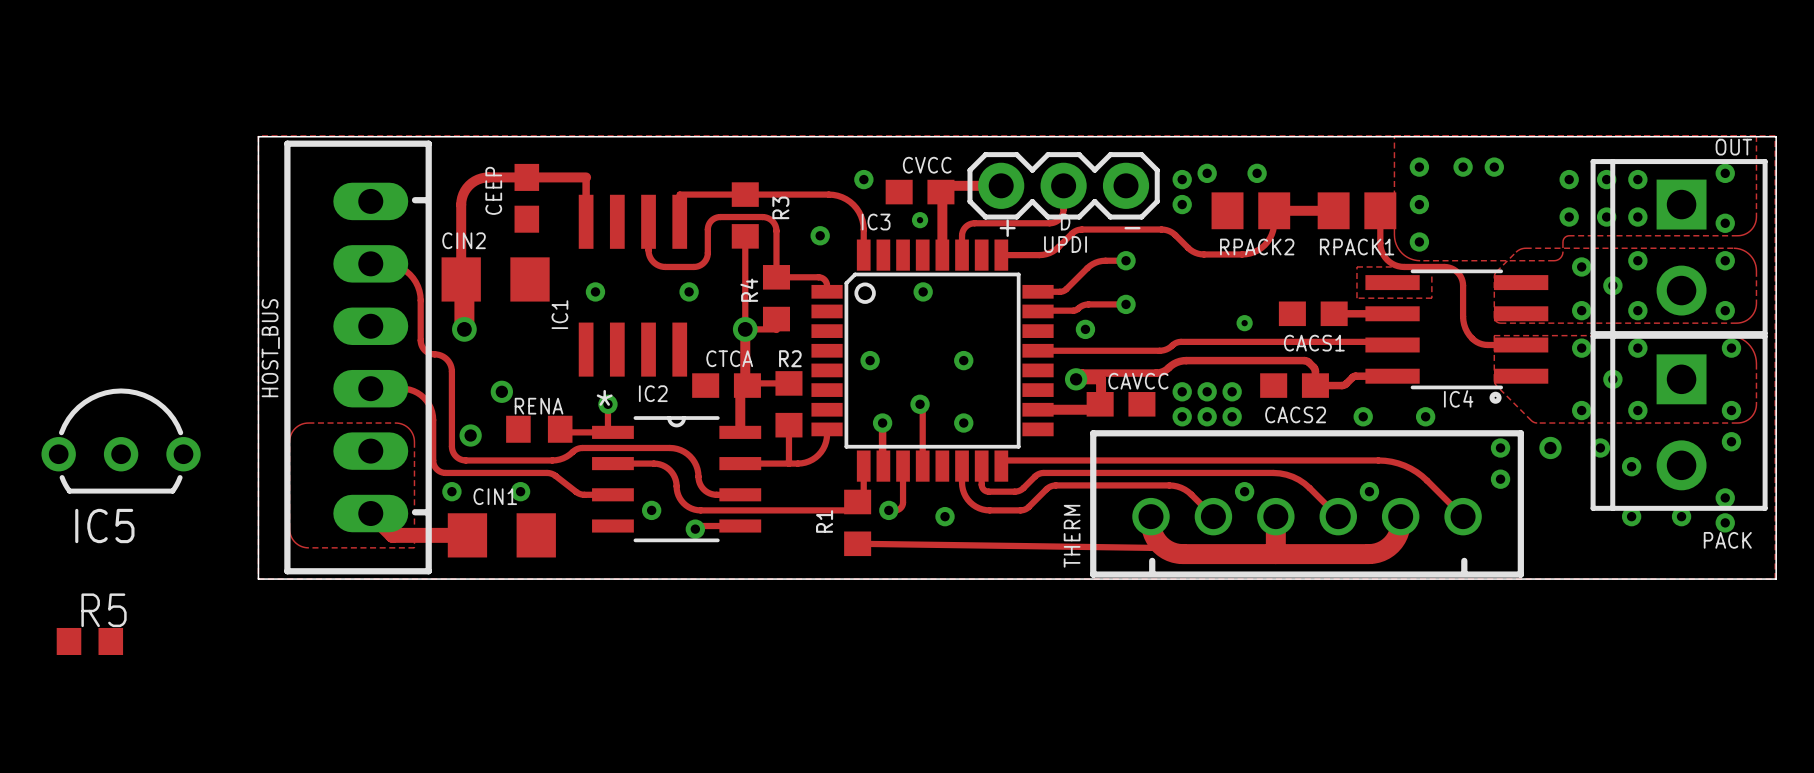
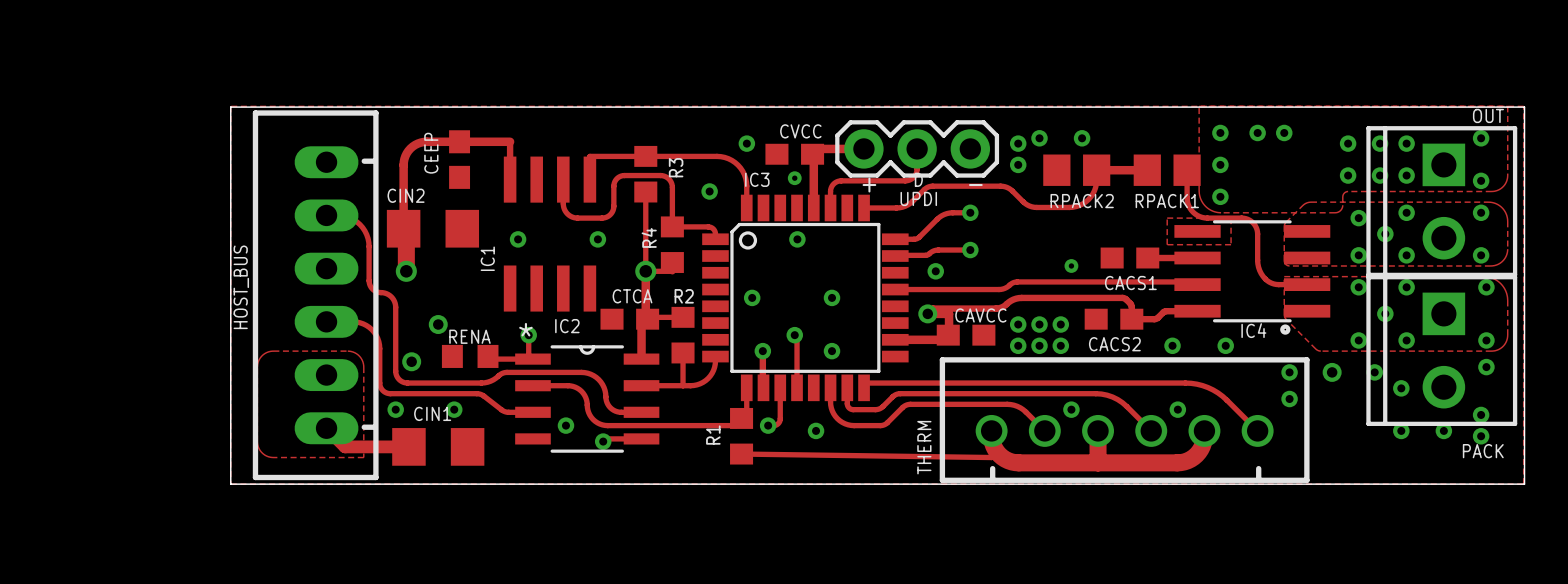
IC5: (121, 441) -> none
R5: (89, 641) -> none

